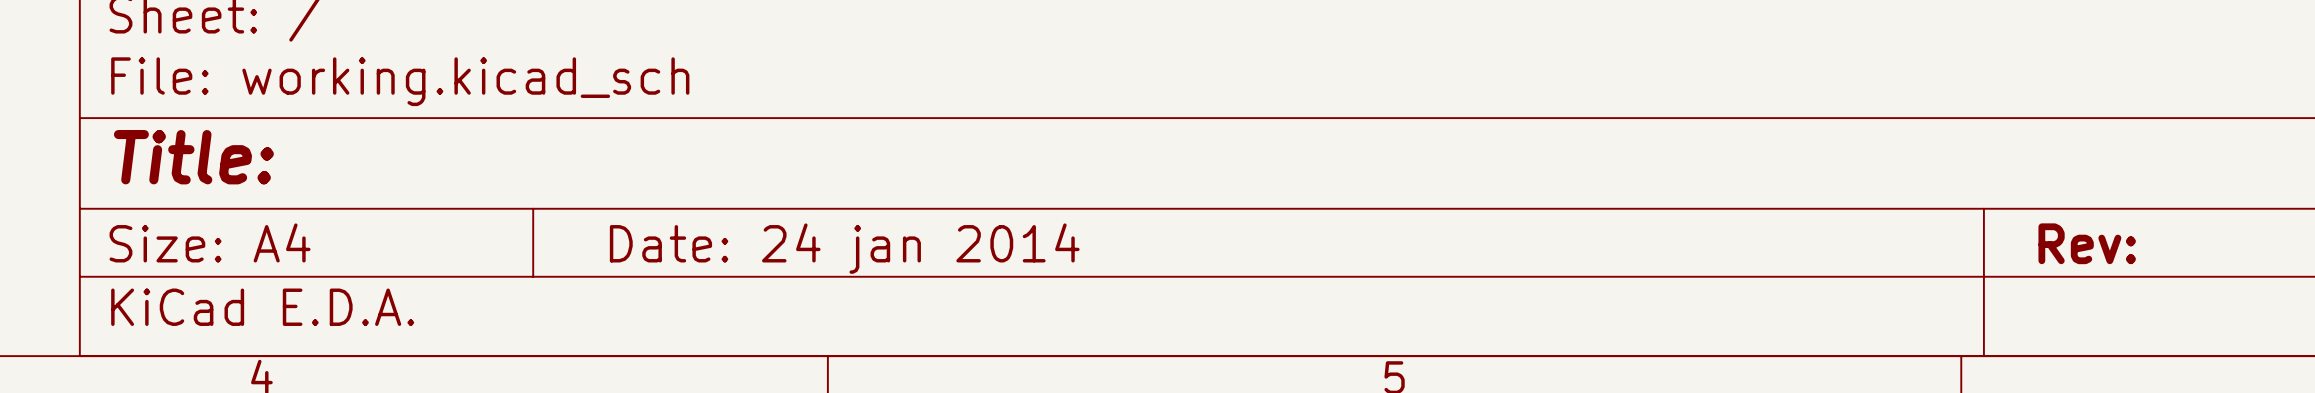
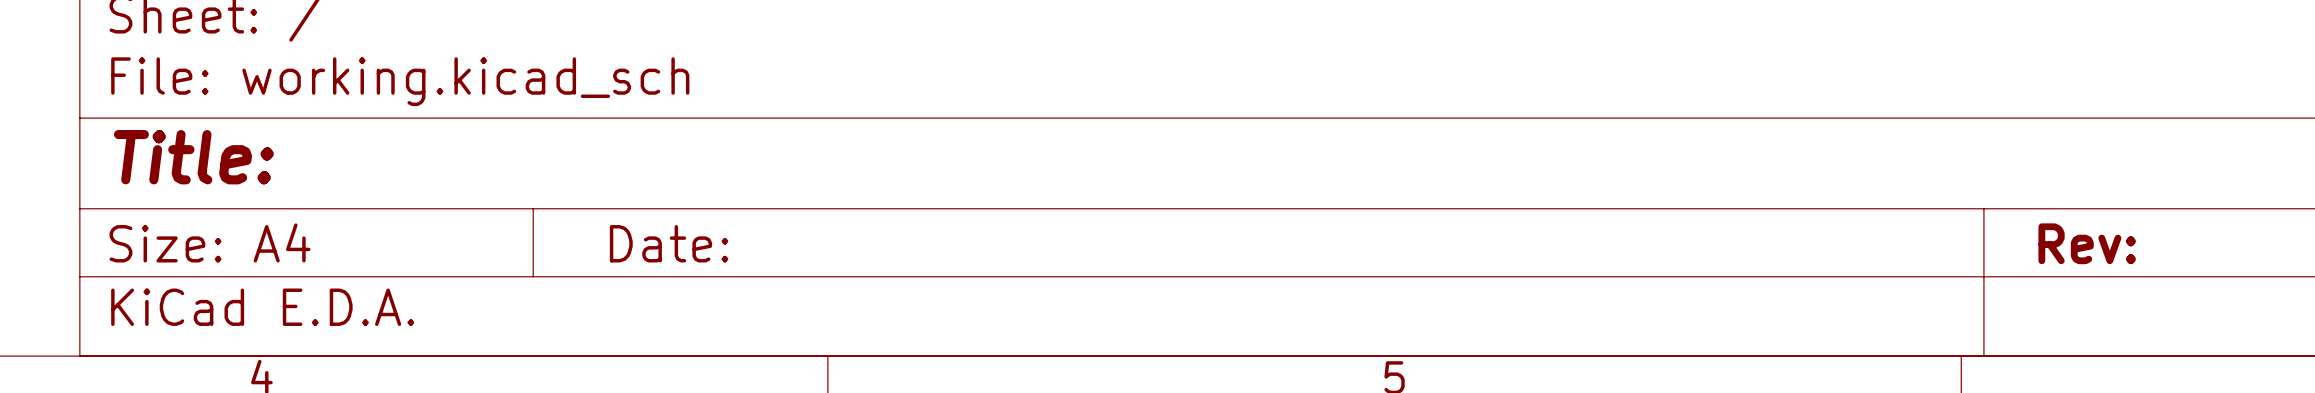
title block: Date: 24 jan 2014 (844, 248) -> Date: (669, 243)

